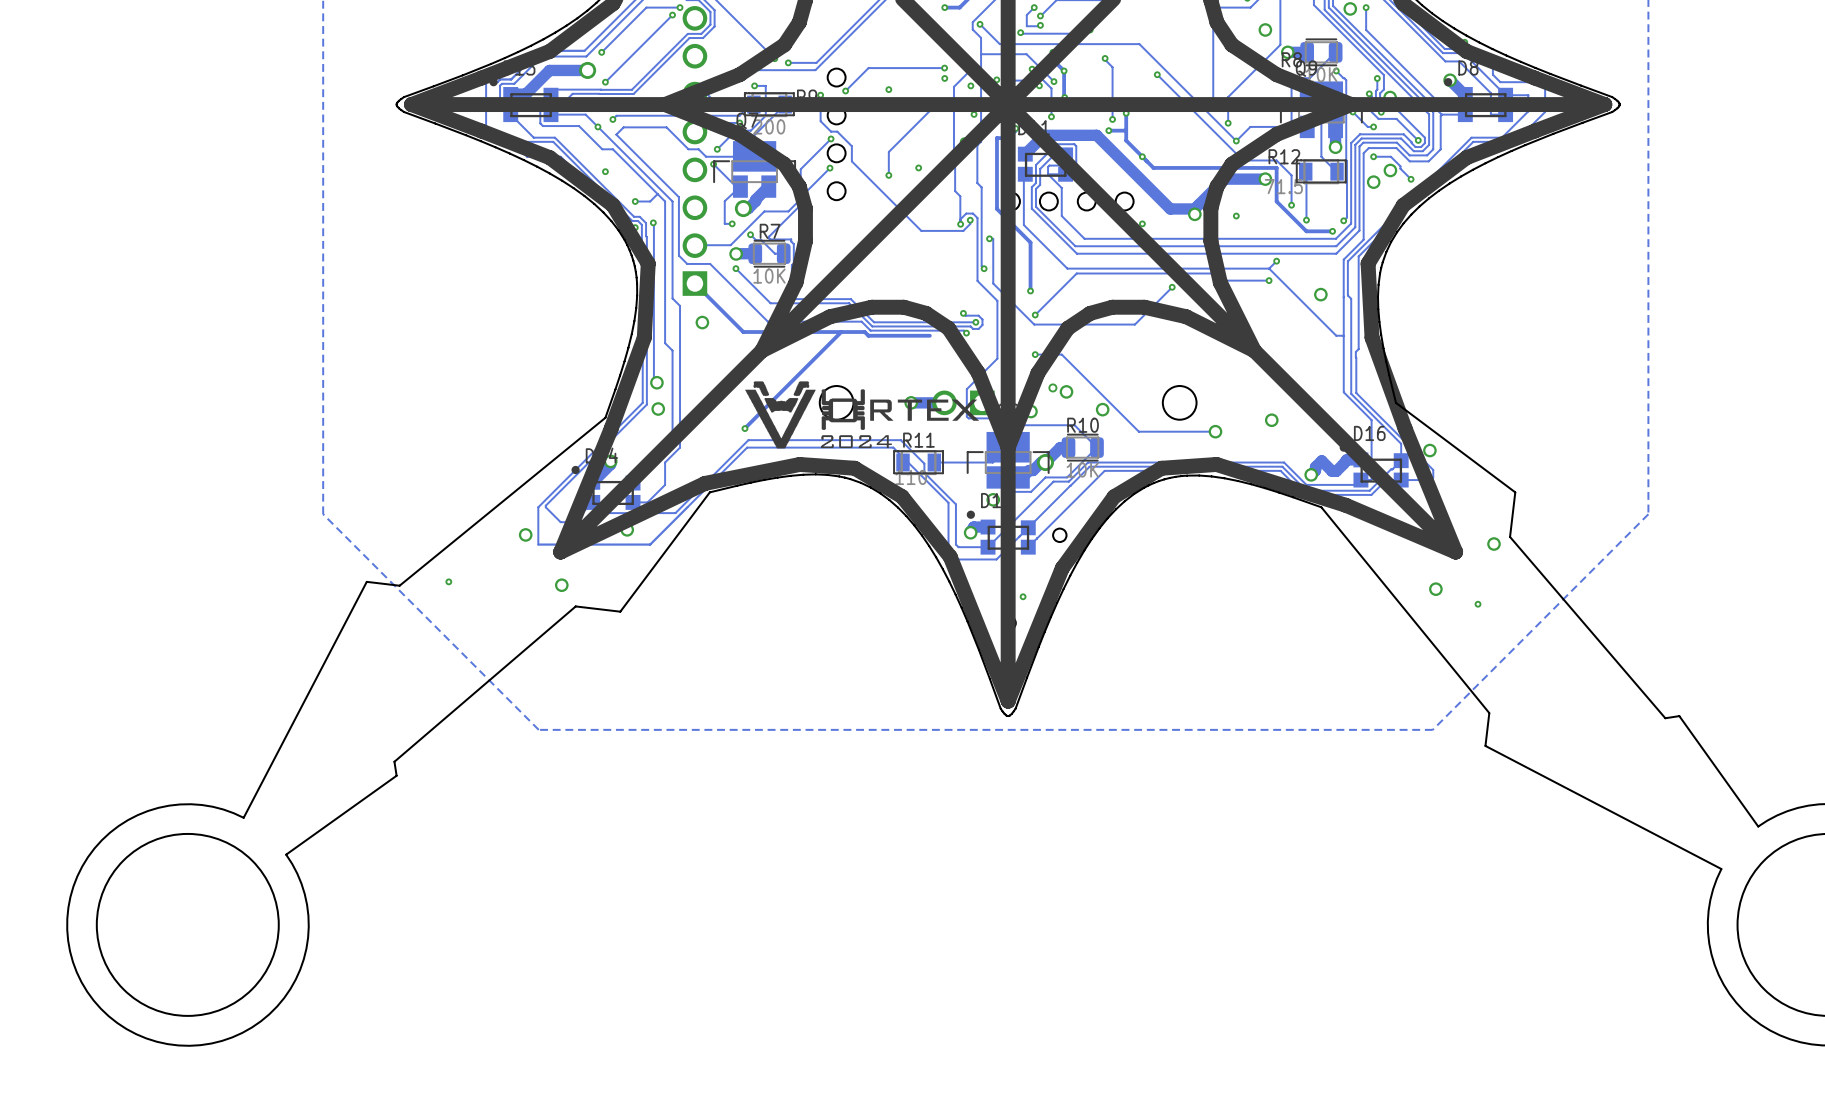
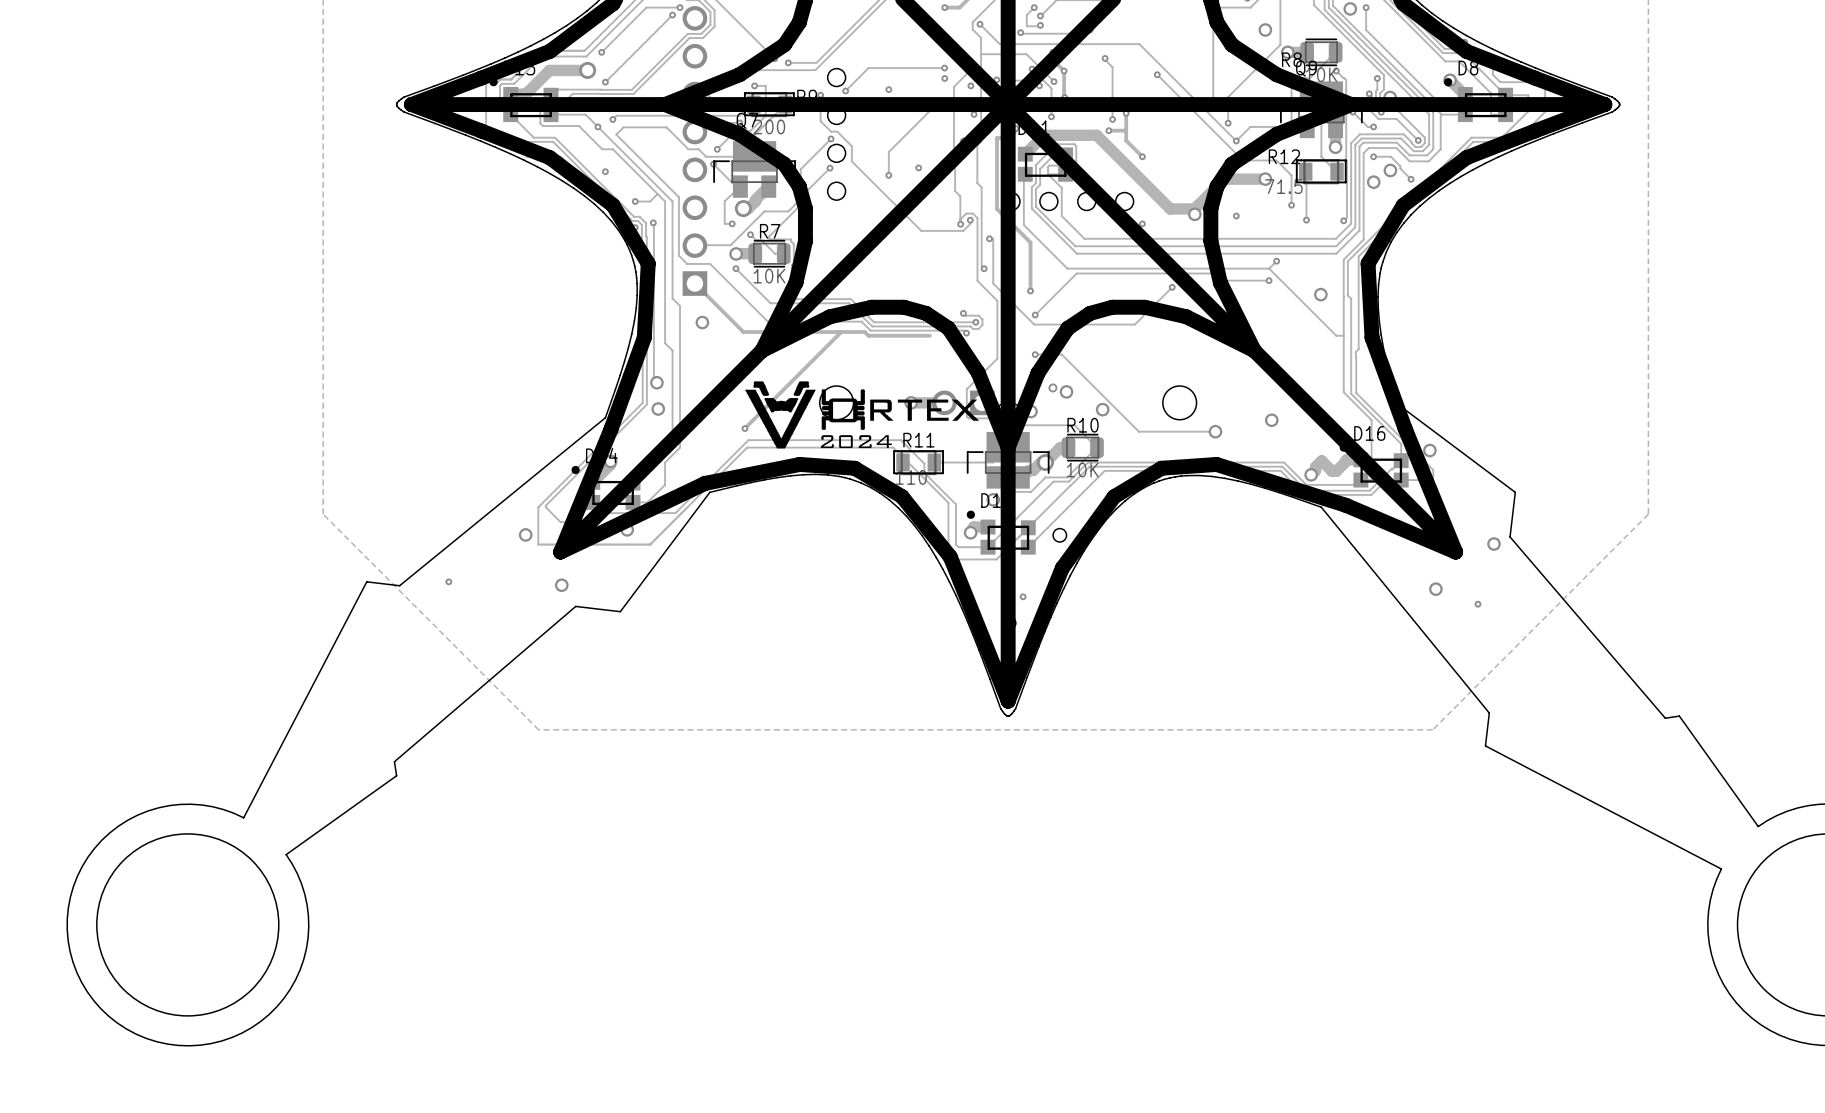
track: (1142, 156) (1153, 167) (1276, 167) (1276, 201) (1306, 231) (1332, 231) -> none
via: (1332, 231) -> none

